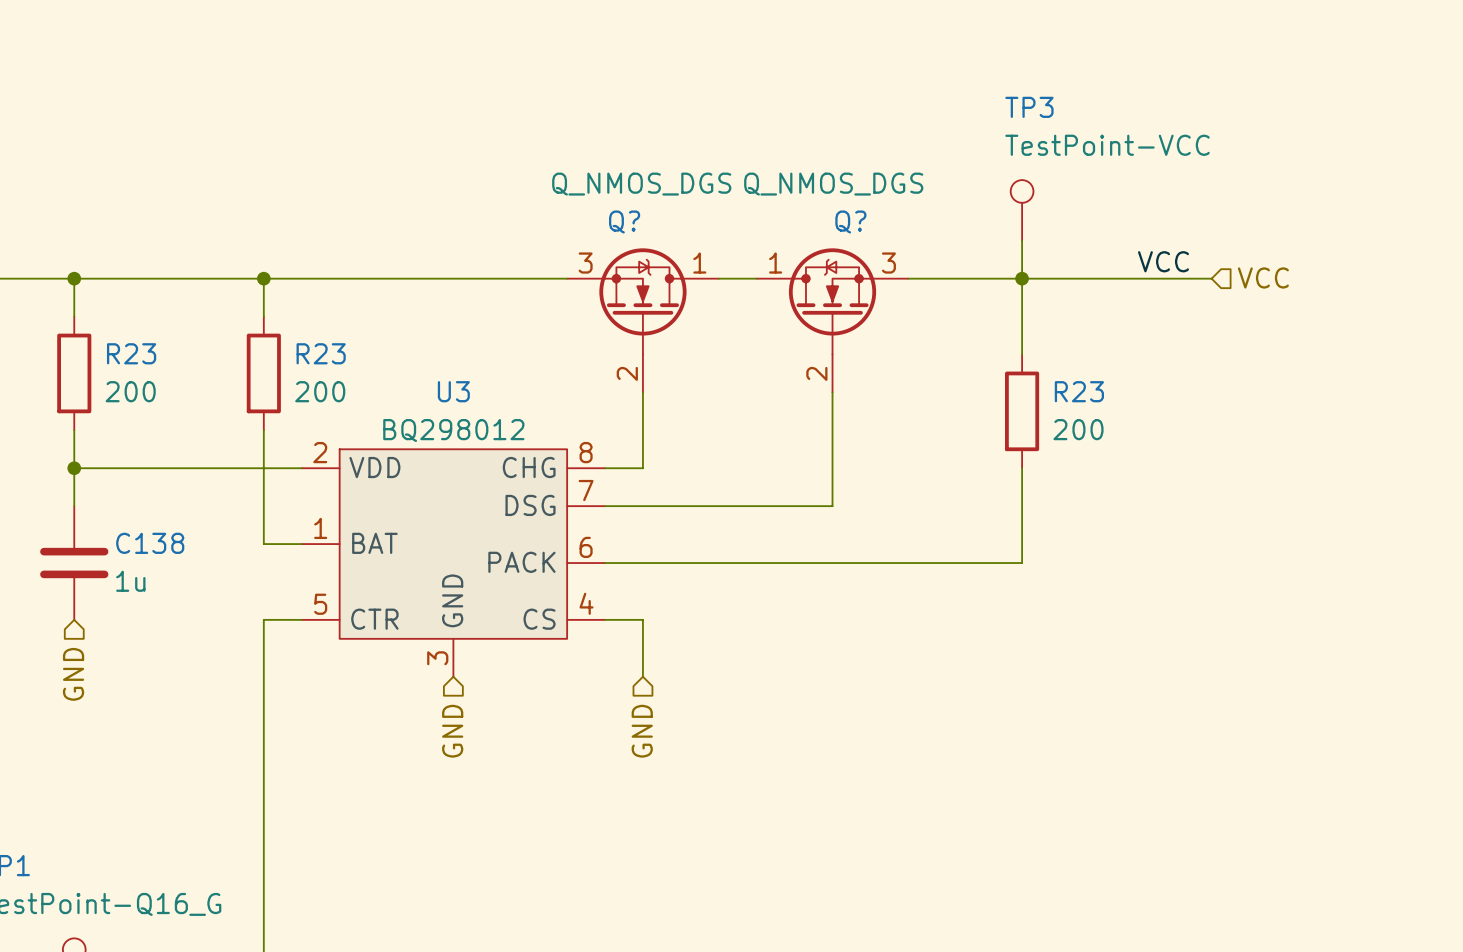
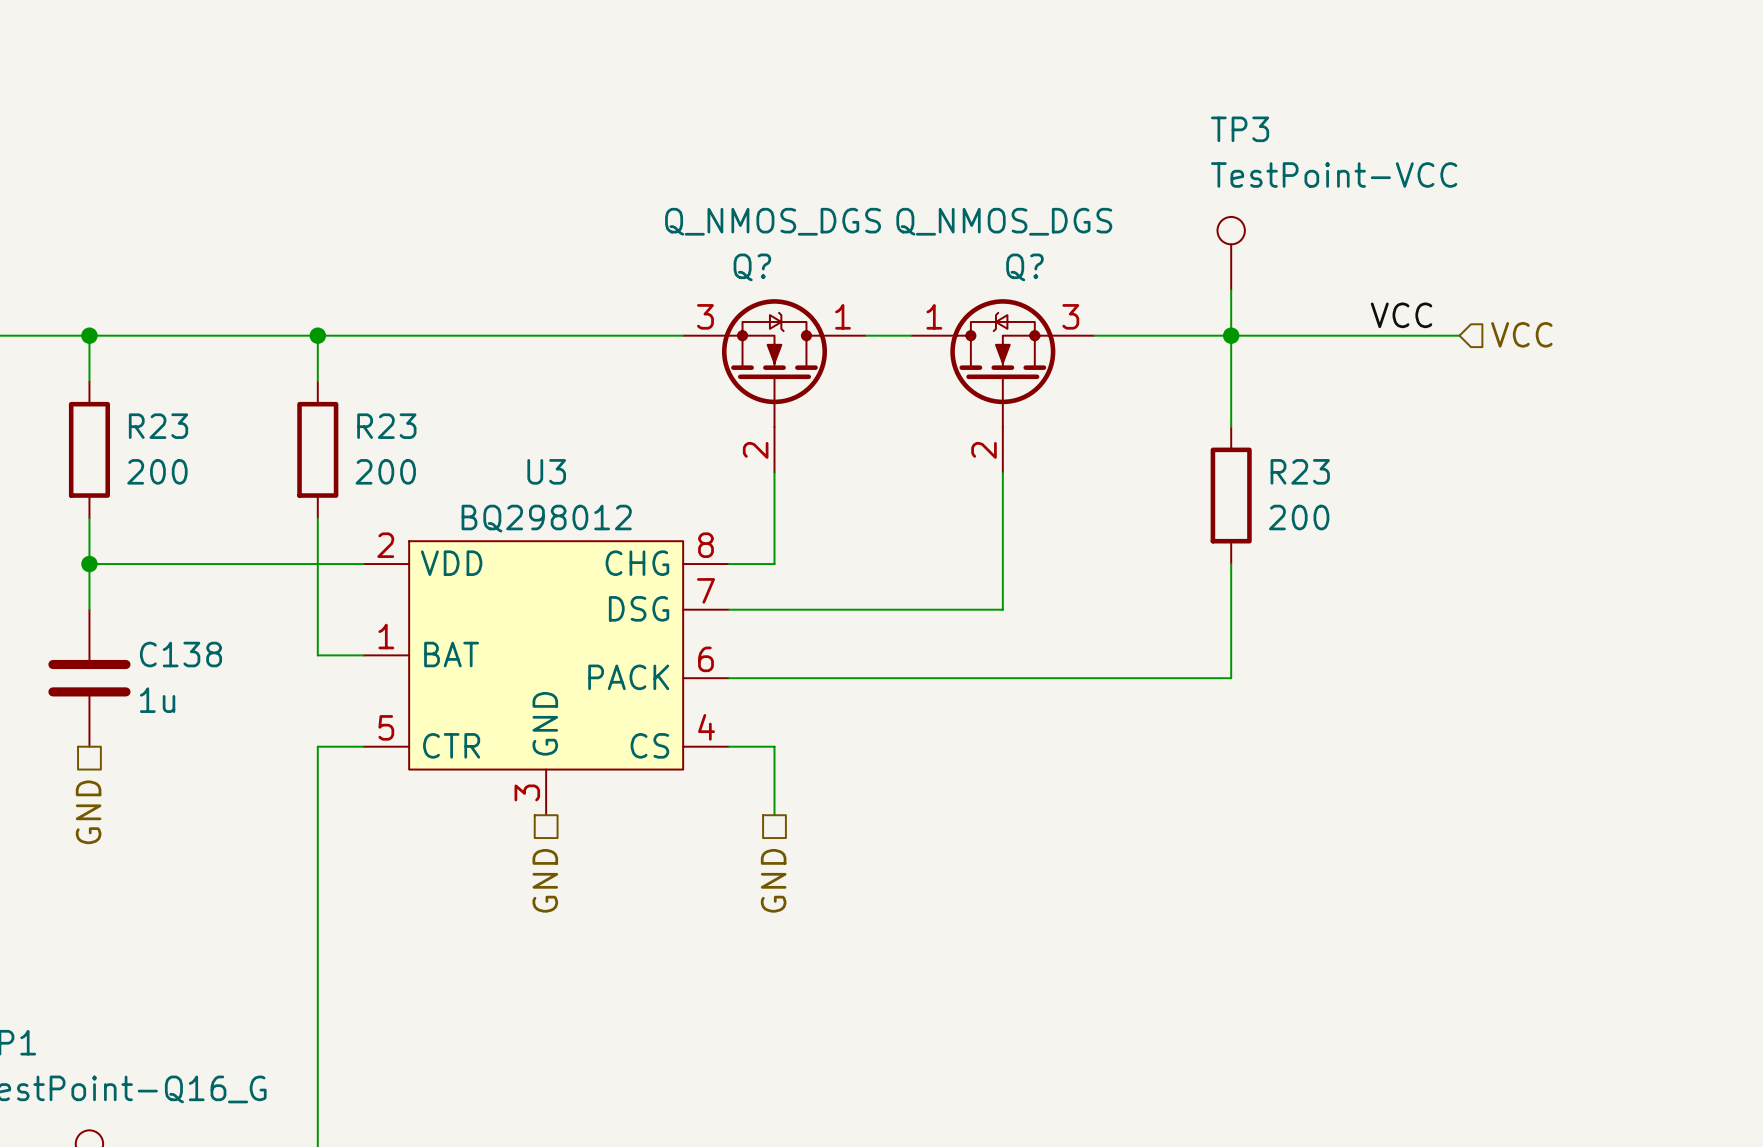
hierarchical label shape: input (73, 674) -> passive (88, 812)
hierarchical label shape: input (452, 731) -> passive (545, 880)
hierarchical label shape: input (642, 731) -> passive (773, 880)

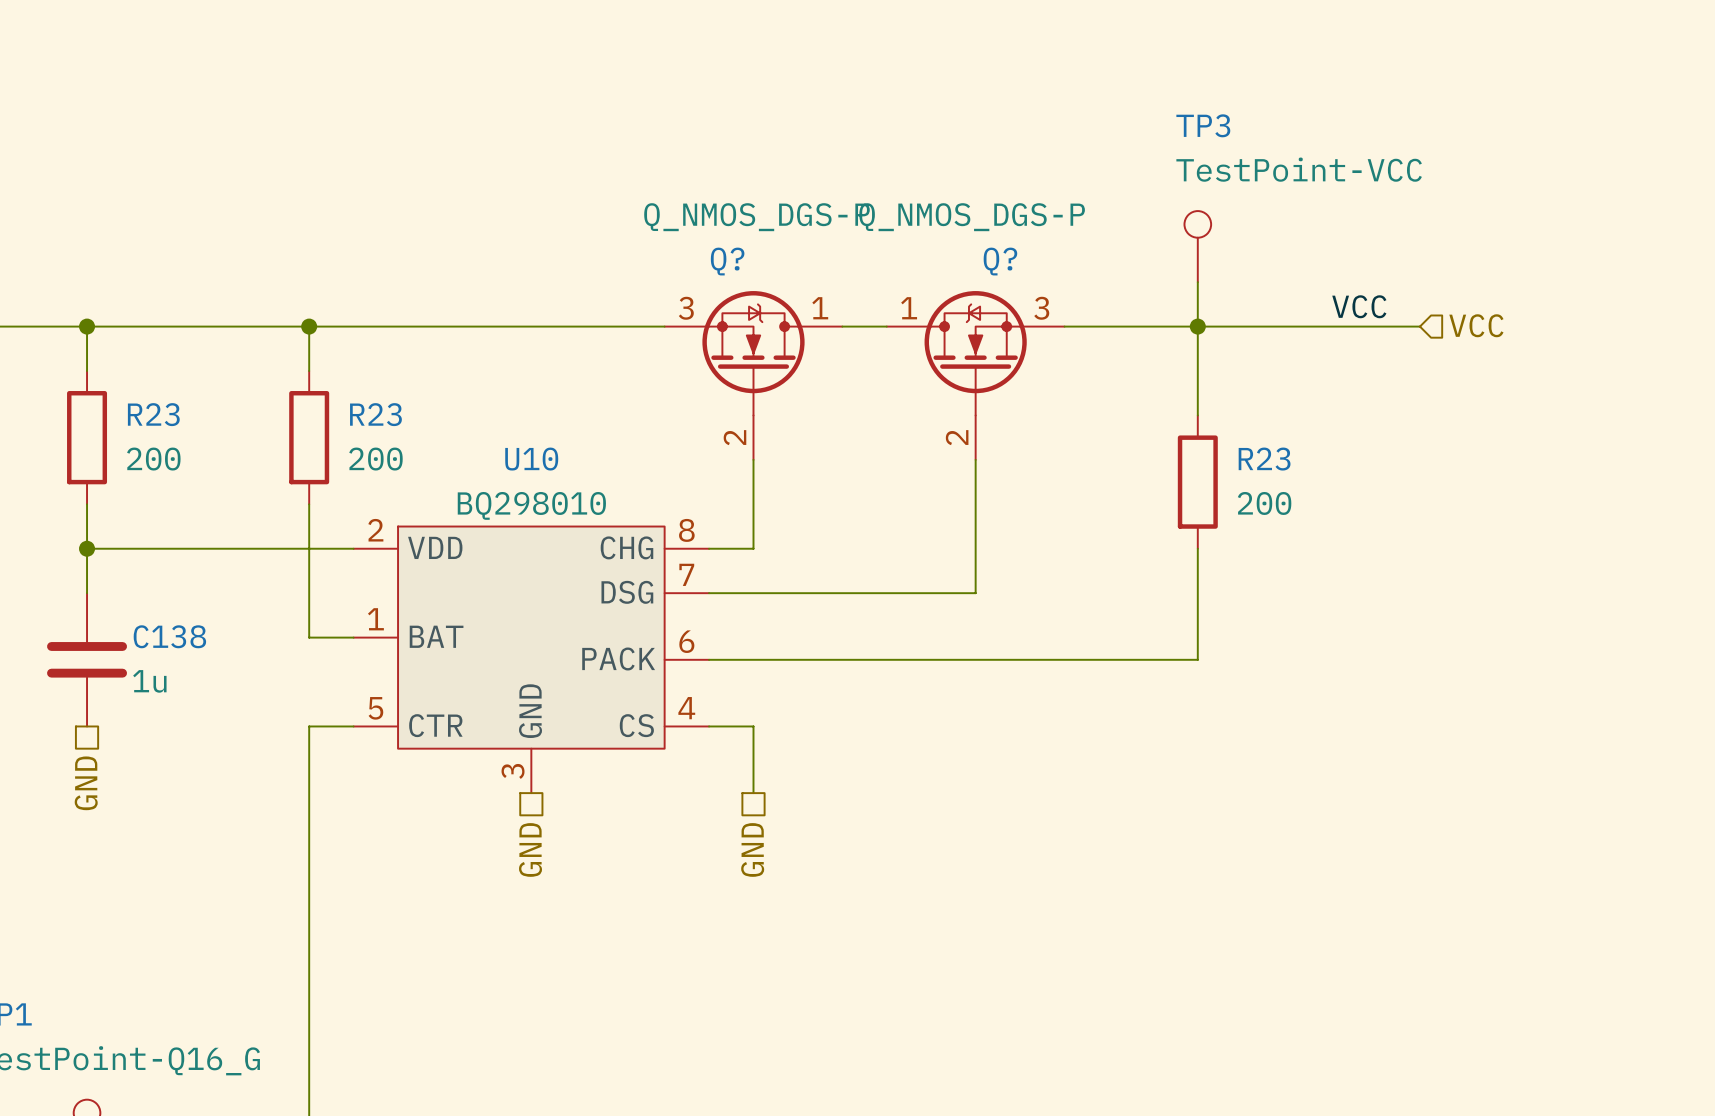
Q? value: Q_NMOS_DGS (773, 221) -> Q_NMOS_DGS-P (756, 217)
Q? value: Q_NMOS_DGS (1004, 221) -> Q_NMOS_DGS-P (972, 217)
U3 name: U3 (546, 471) -> U10 (531, 459)
U3 value: BQ298012 (546, 518) -> BQ298010 (531, 505)

